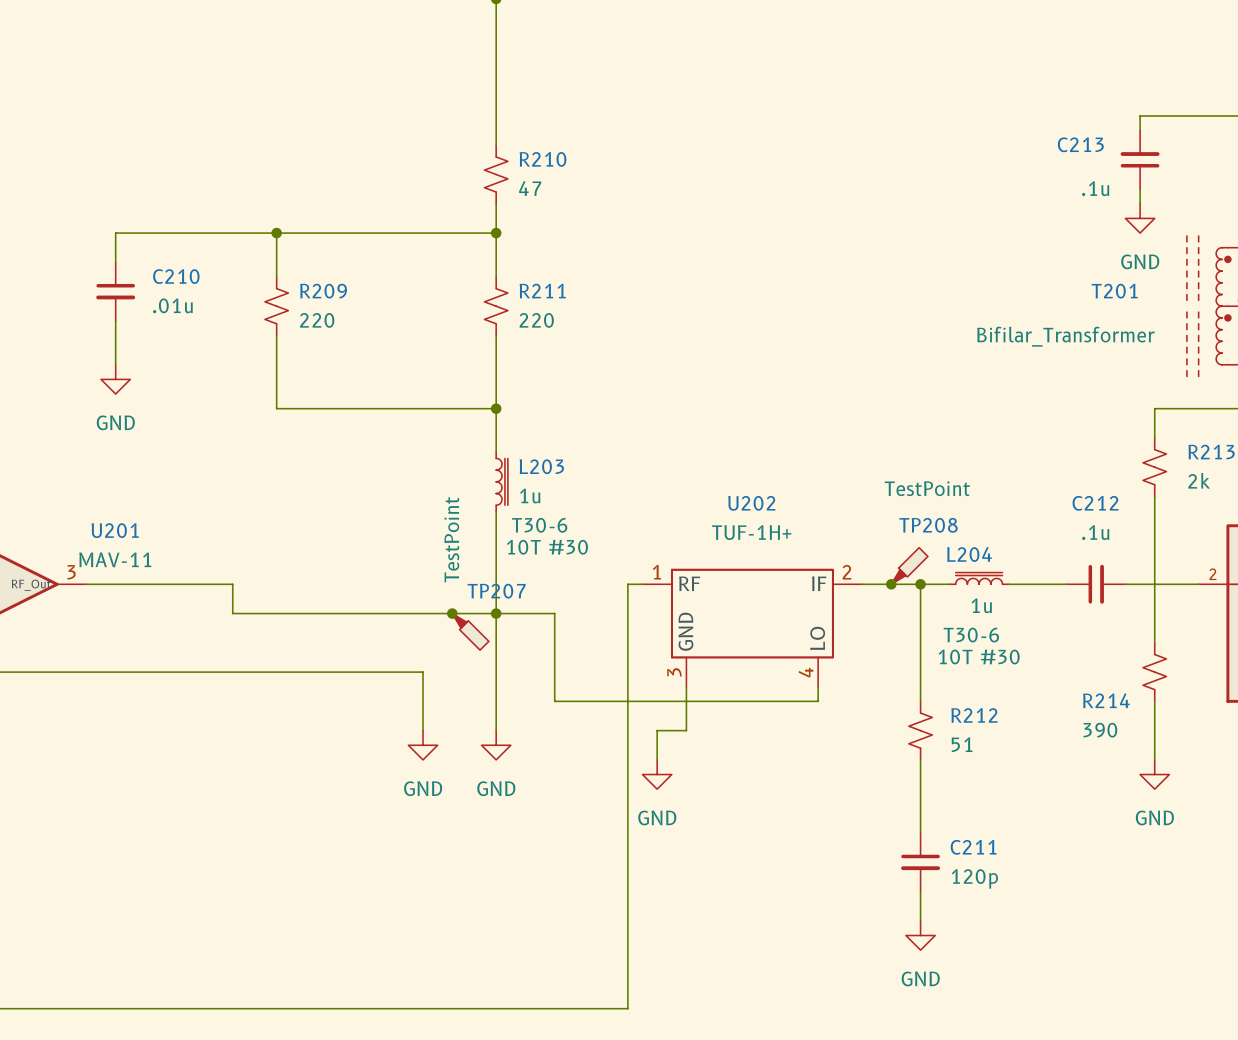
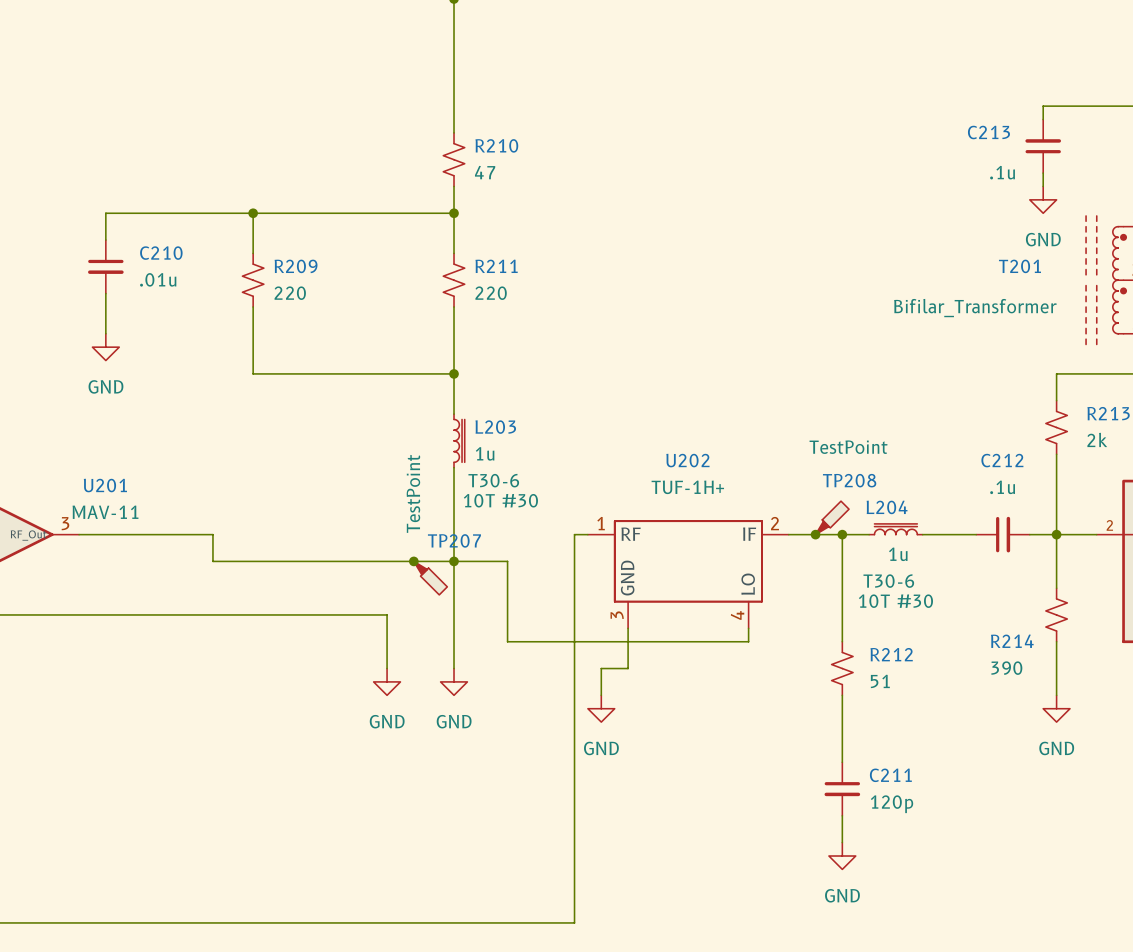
junction: none -> (1056, 534)

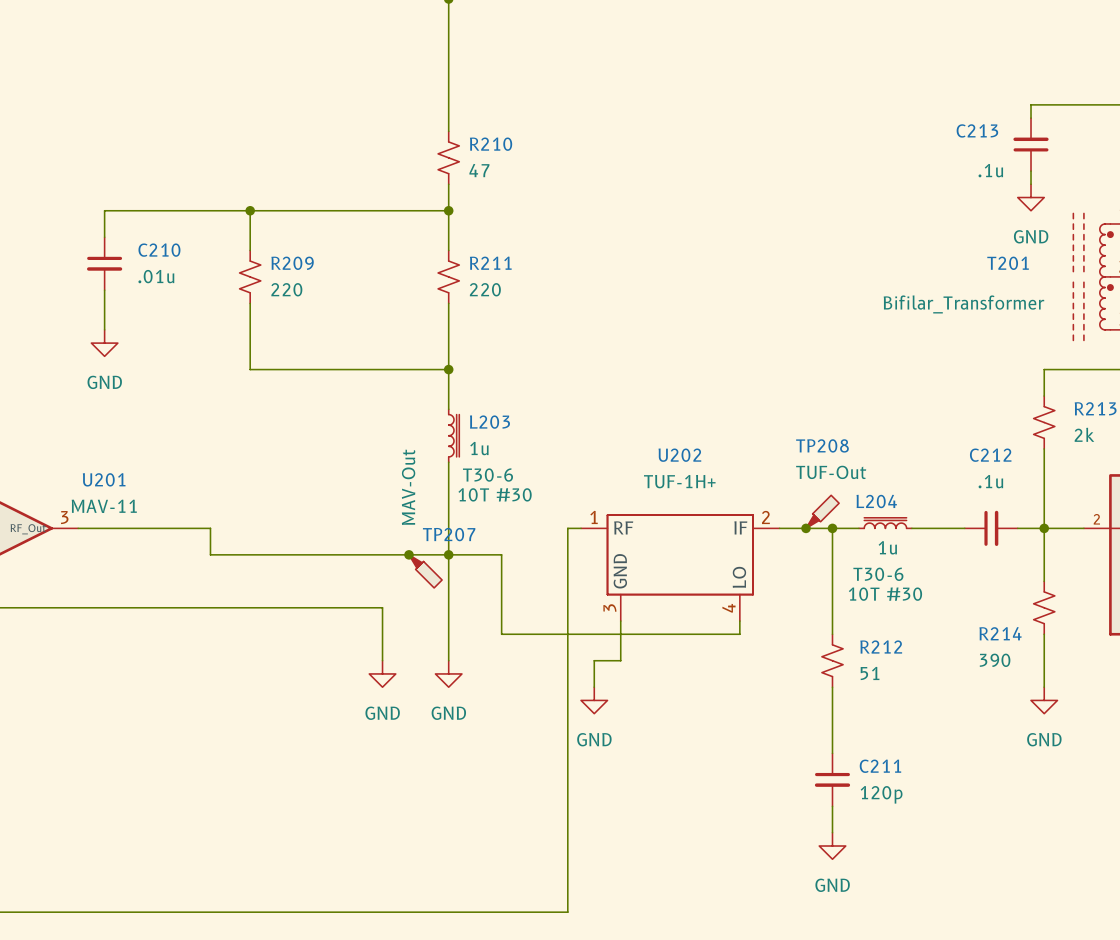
TP208 value: TestPoint (848, 447) -> TUF-Out (831, 472)
TP208 name position: TP208 (849, 480) -> TP208 (822, 445)
TP207 value: TestPoint (413, 493) -> MAV-Out (408, 487)

